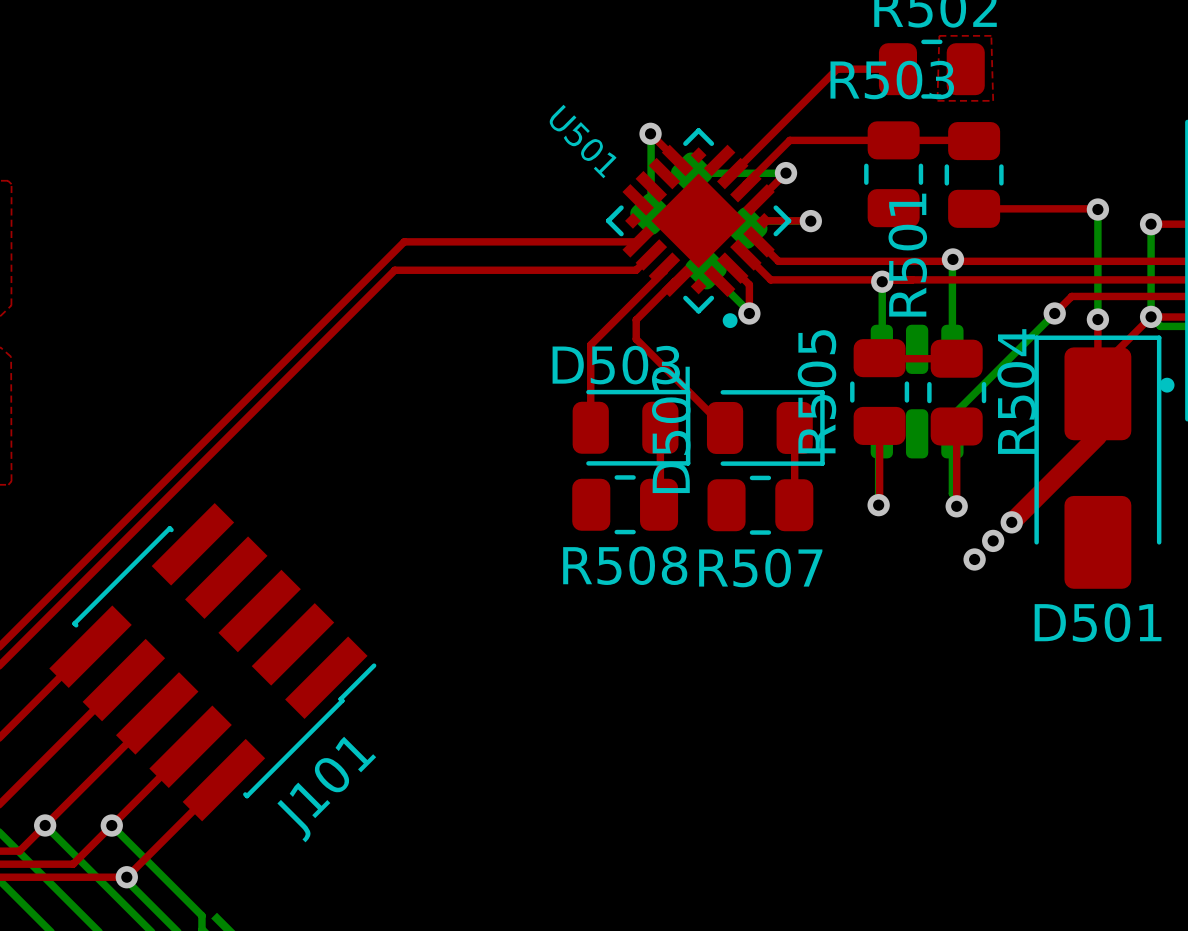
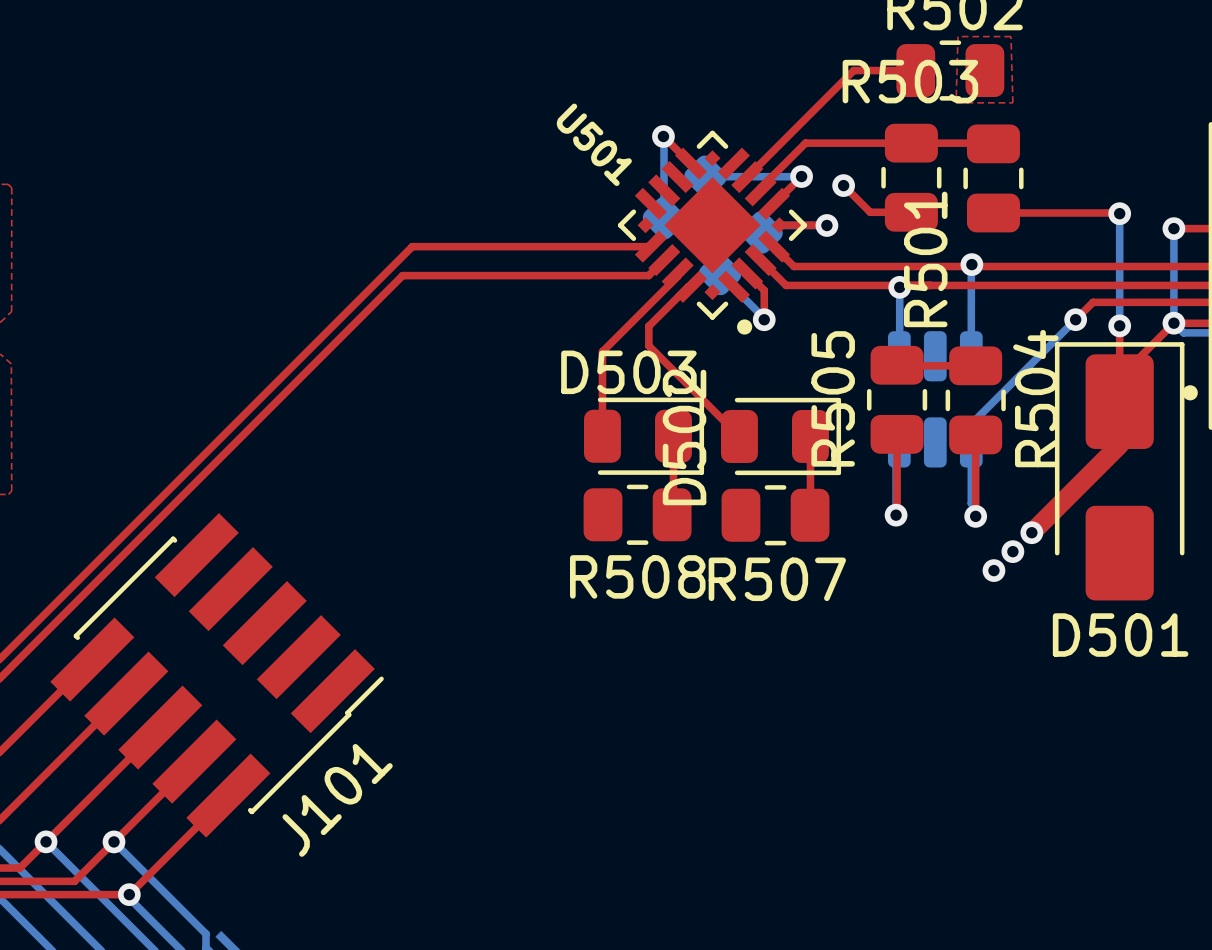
top track: none -> (843, 185) (870, 212) (911, 212)
via: none -> (843, 185)

